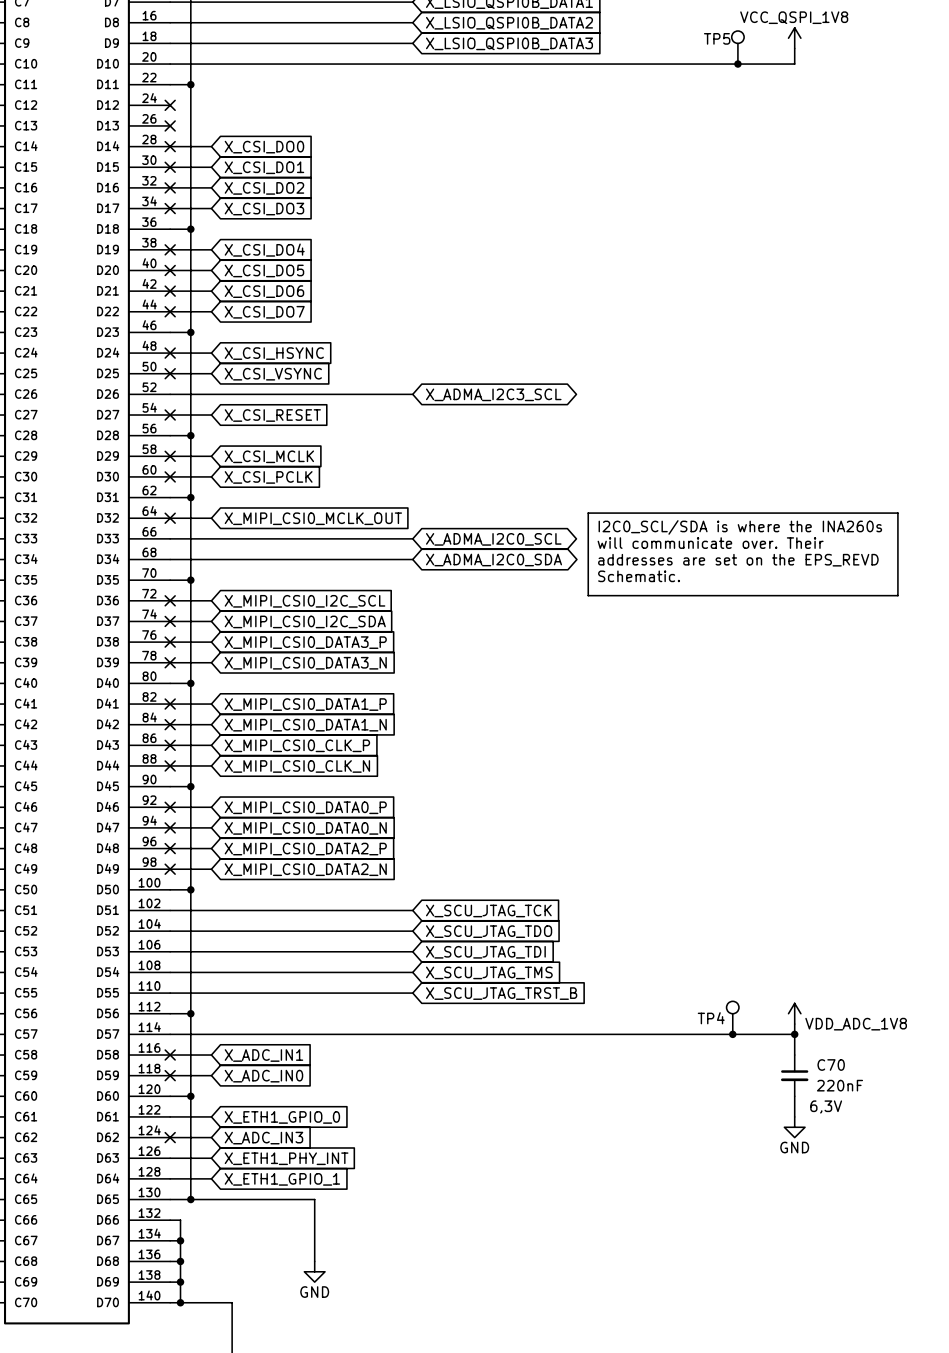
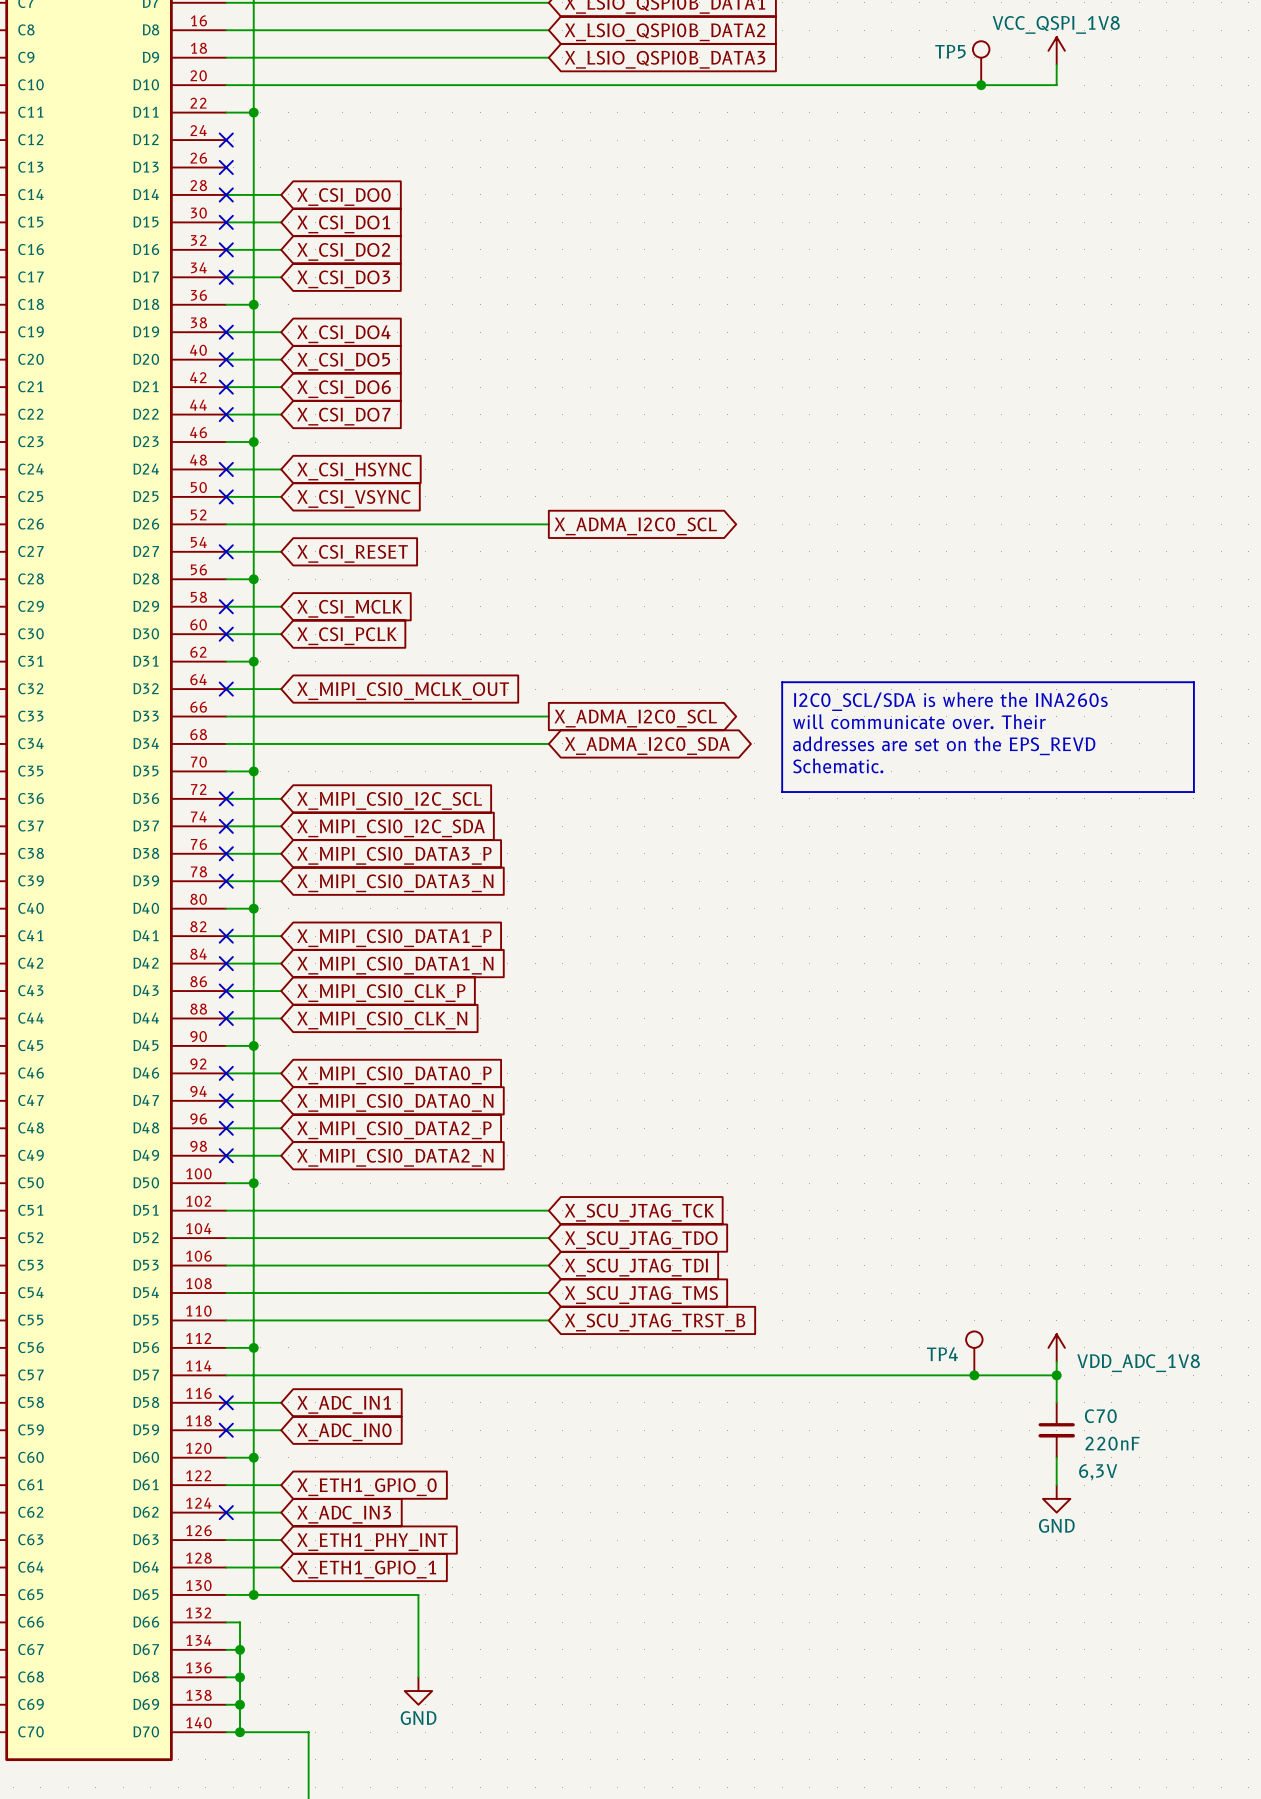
global label shape: bidirectional (493, 394) -> output (635, 526)
global label: X_ADMA_I2C3_SCL (493, 394) -> X_ADMA_I2C0_SCL (635, 526)
global label shape: bidirectional (493, 539) -> output (635, 718)

